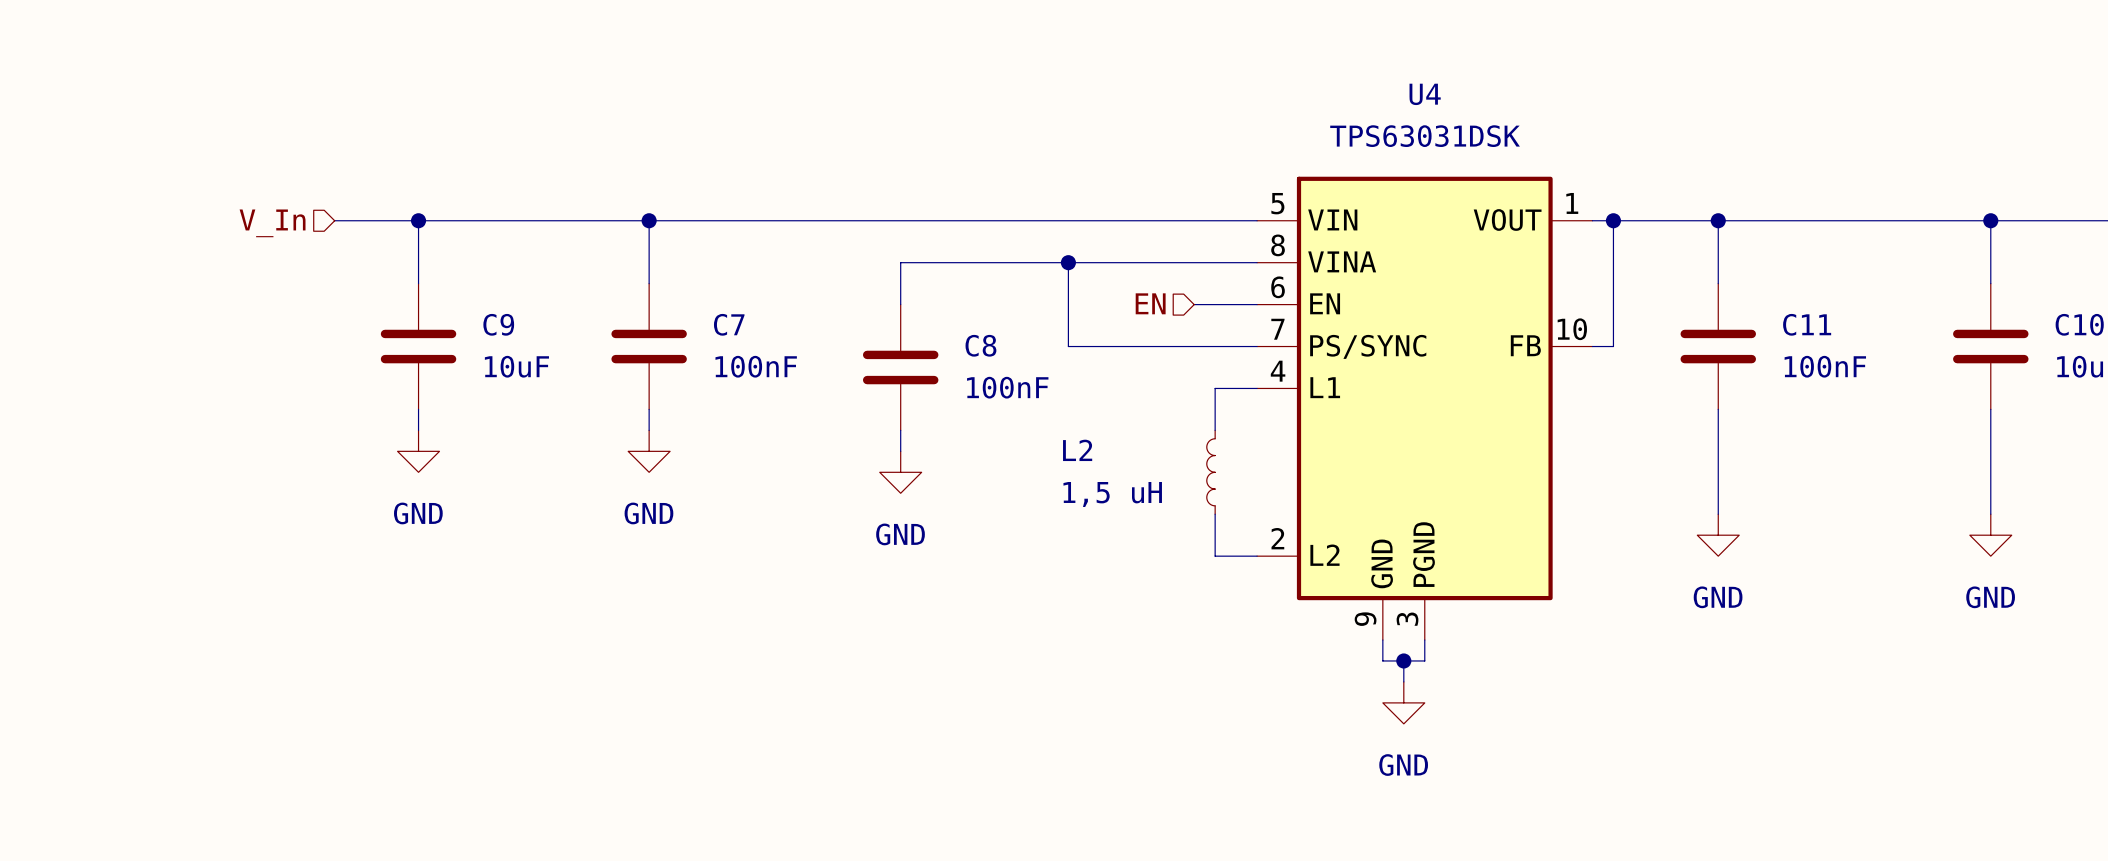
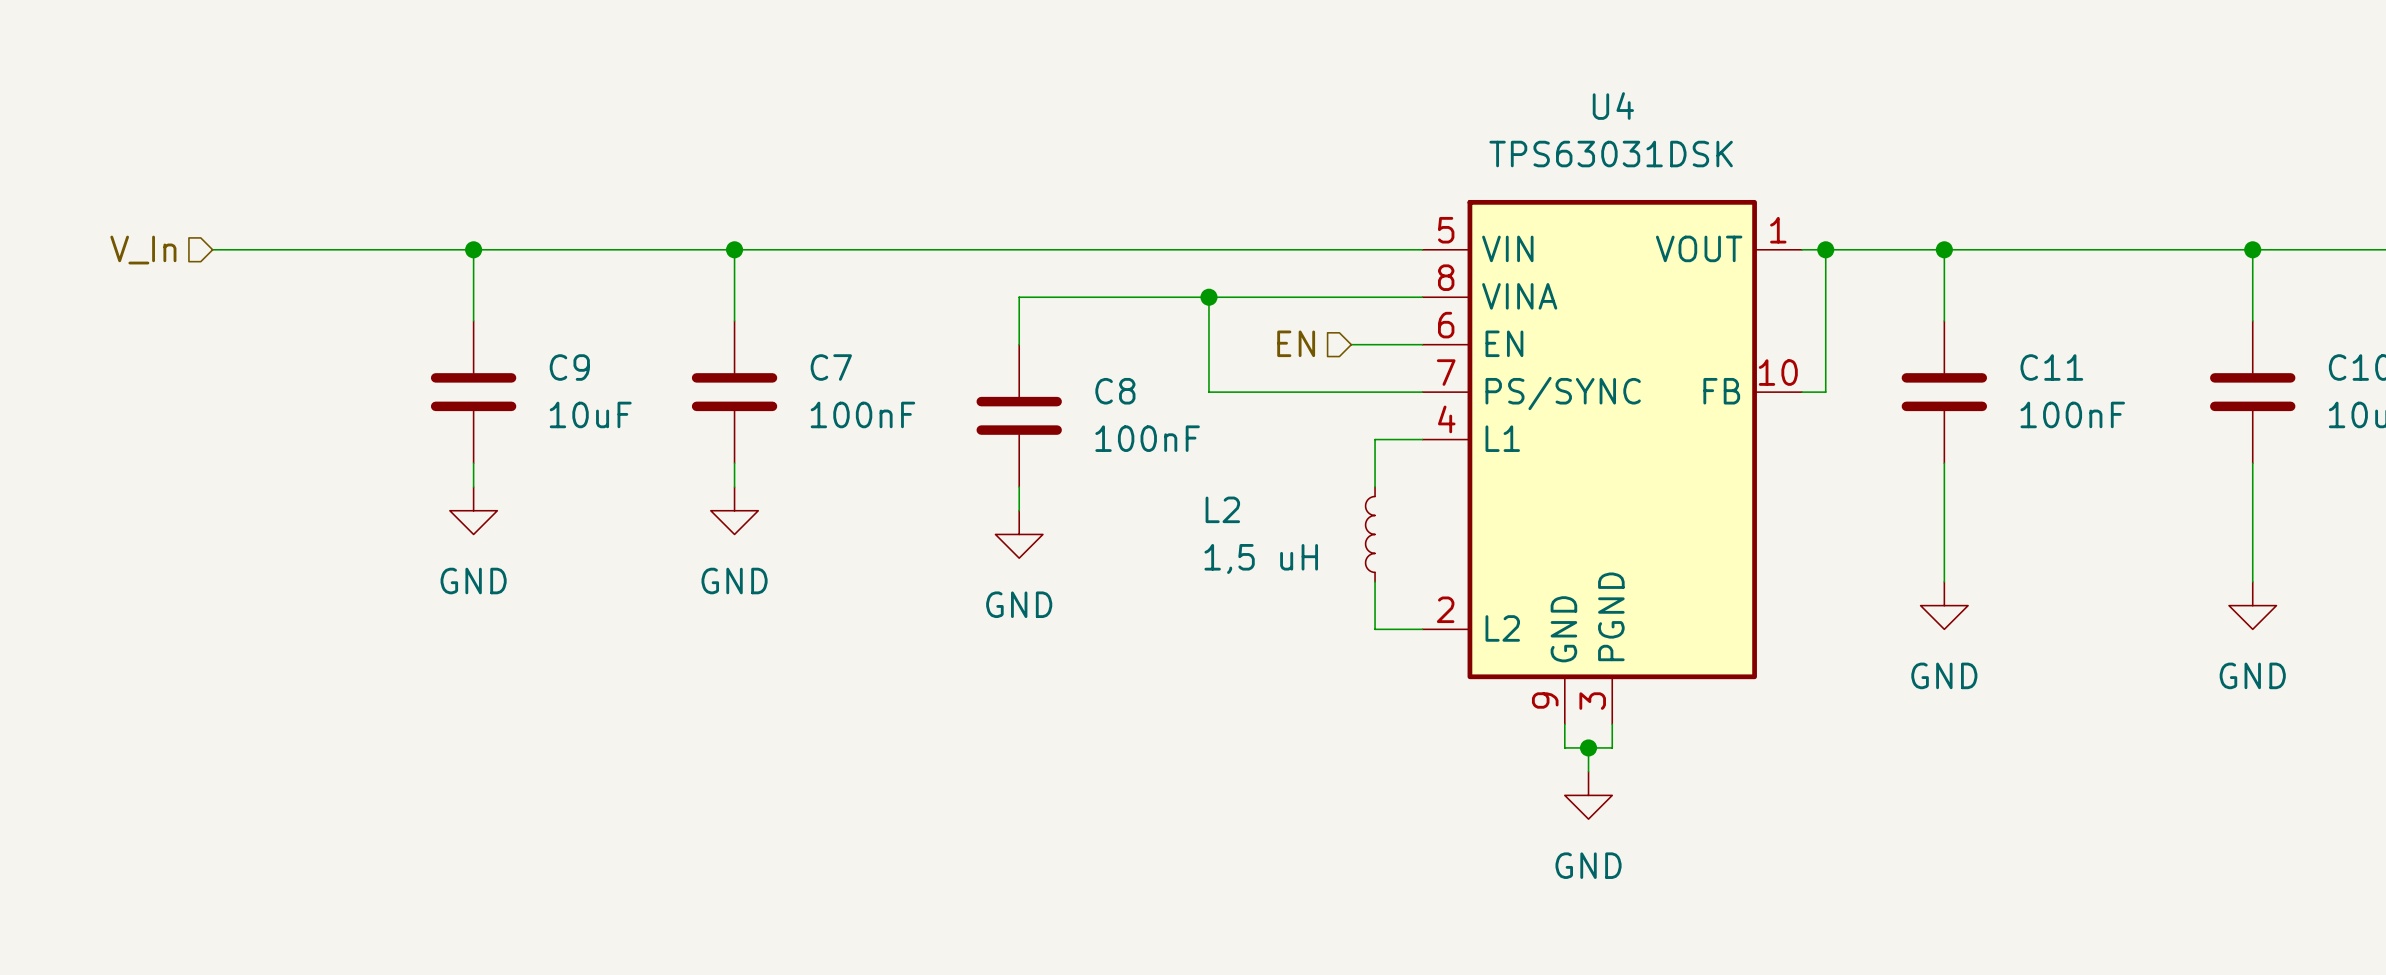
wire: none -> (212, 249) (378, 249)
hierarchical label position: V_In (272, 223) -> V_In (143, 250)

